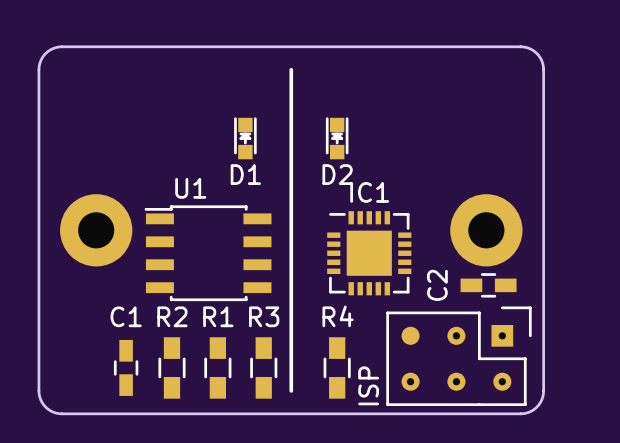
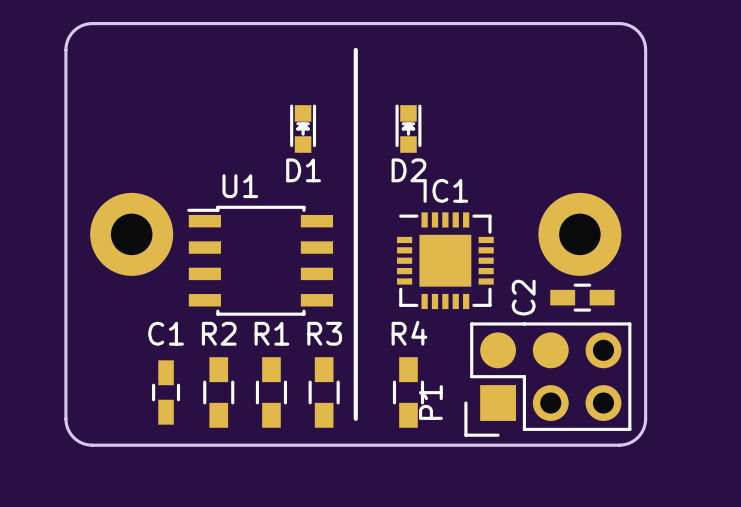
part: ISP (458, 356) -> none
P1: none -> (547, 379)

